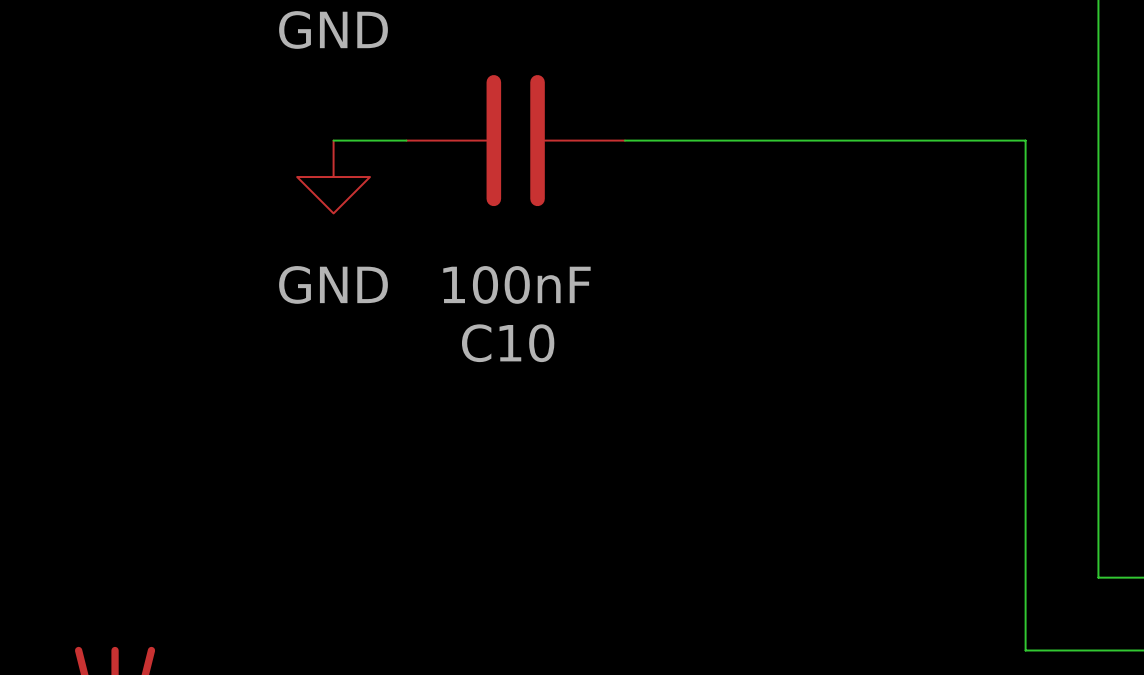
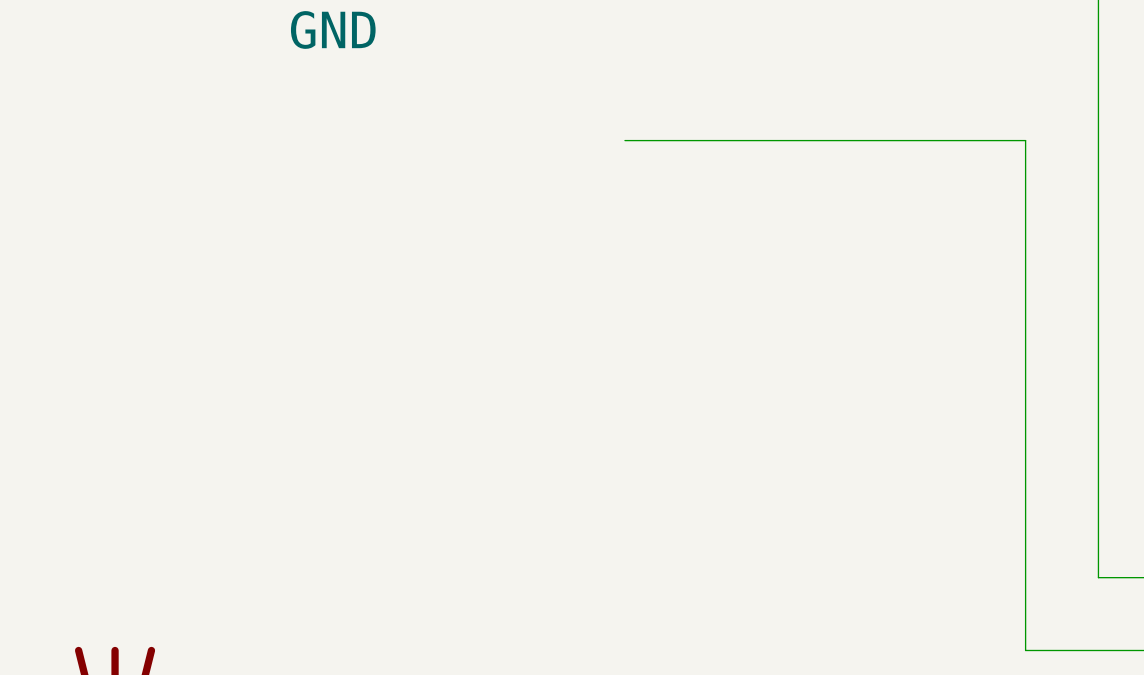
wire: (333, 140) (406, 140) -> none
C10: 100nF (515, 140) -> none
power symbol: GND (333, 177) -> none

